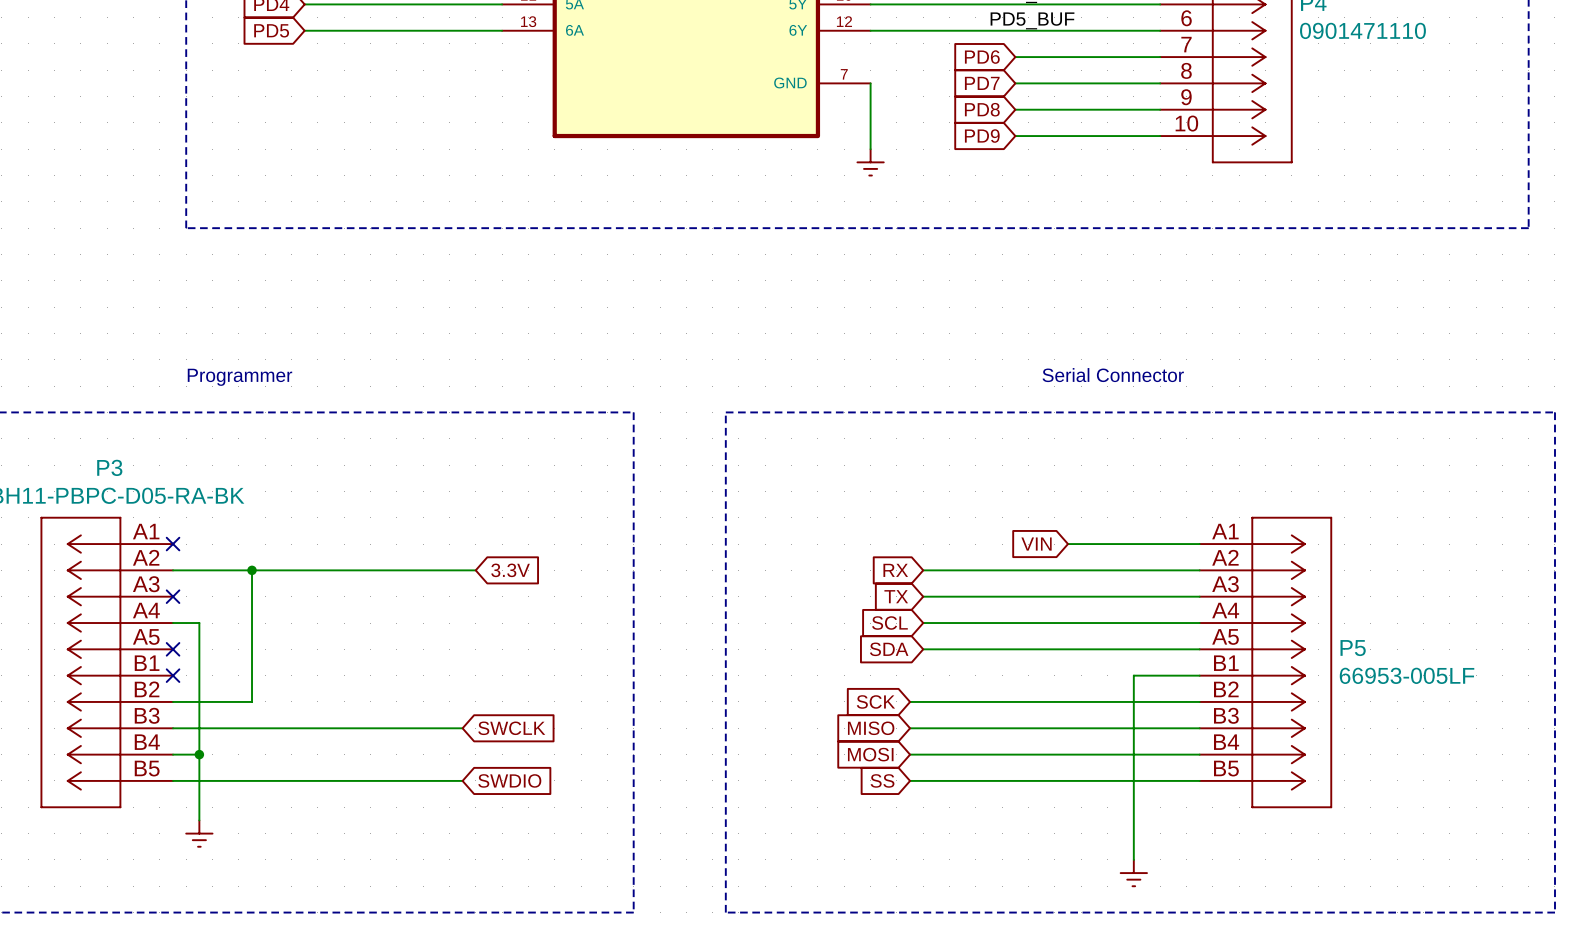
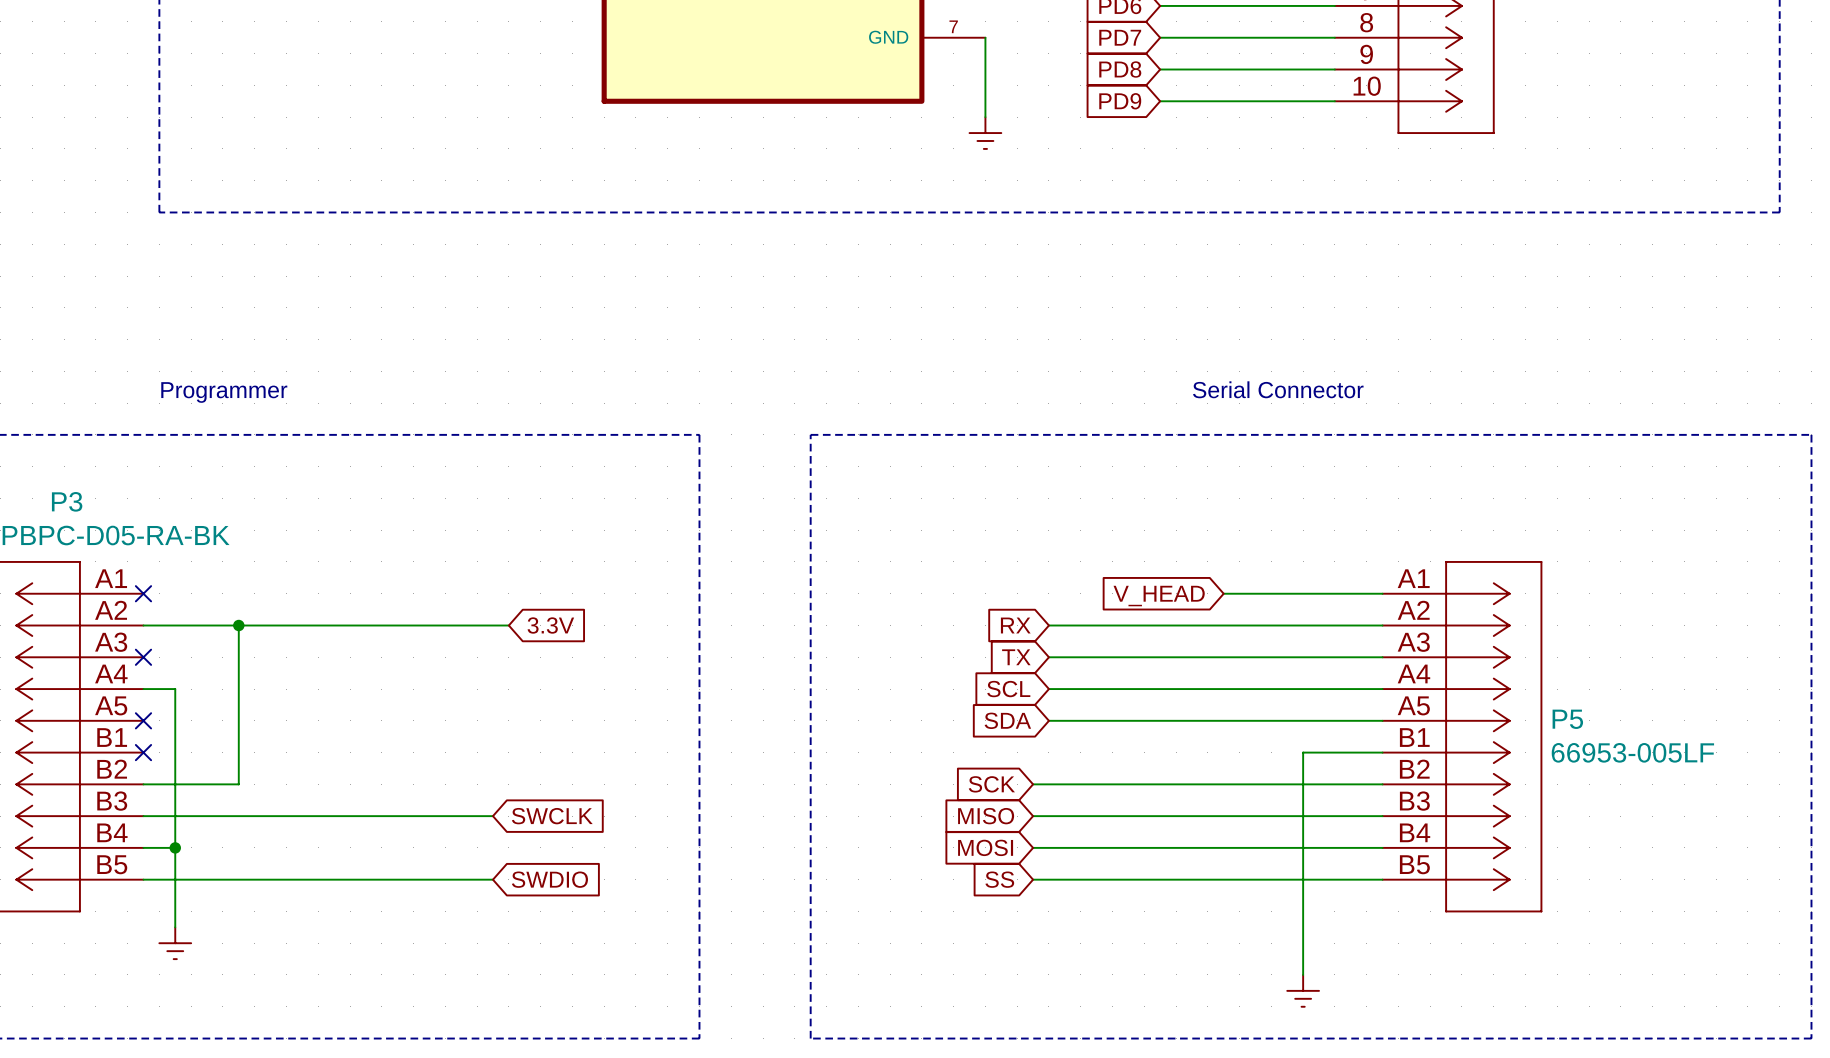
global label: VIN (1036, 544) -> V_HEAD (1159, 596)

